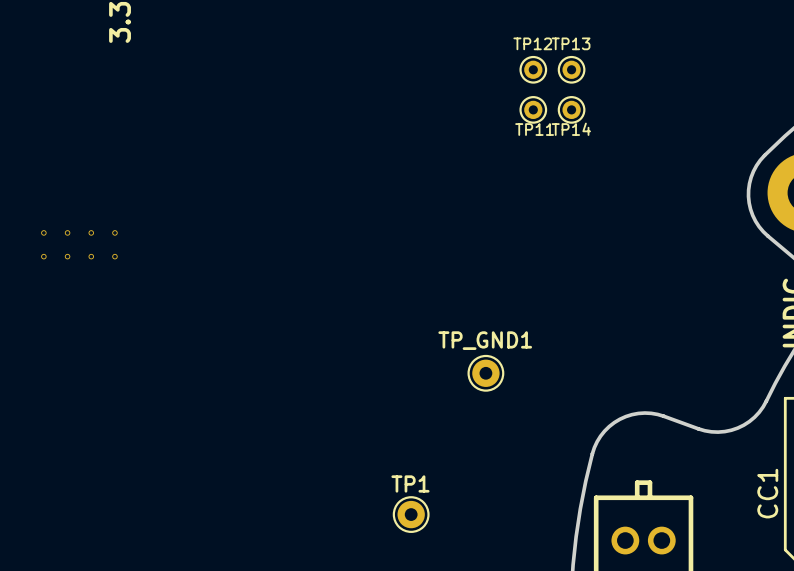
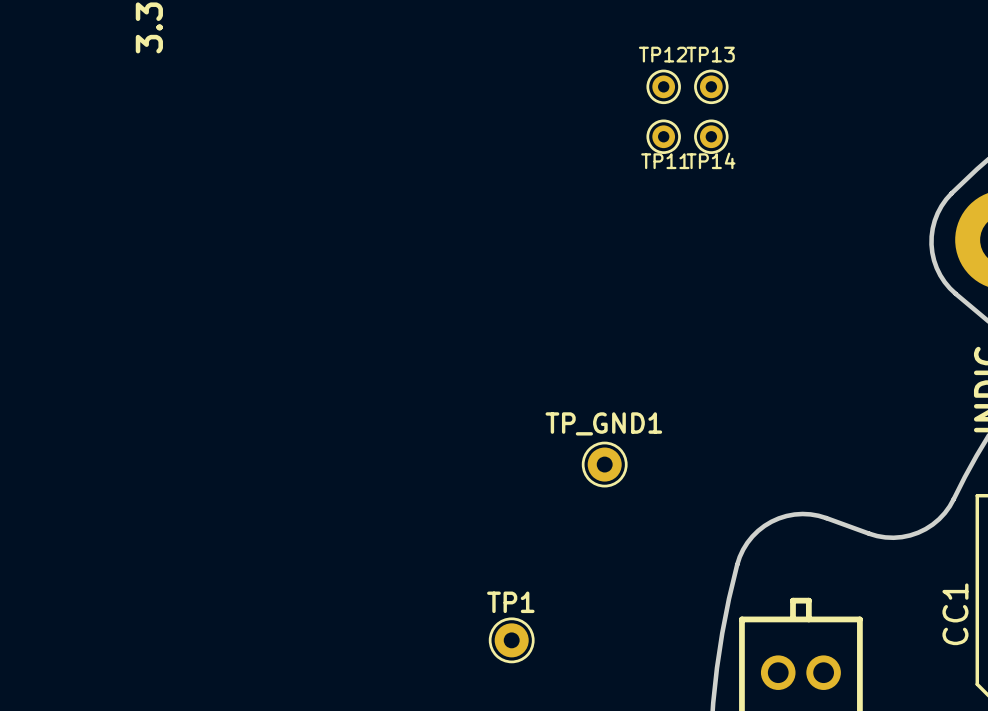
part: (79, 244) -> none

